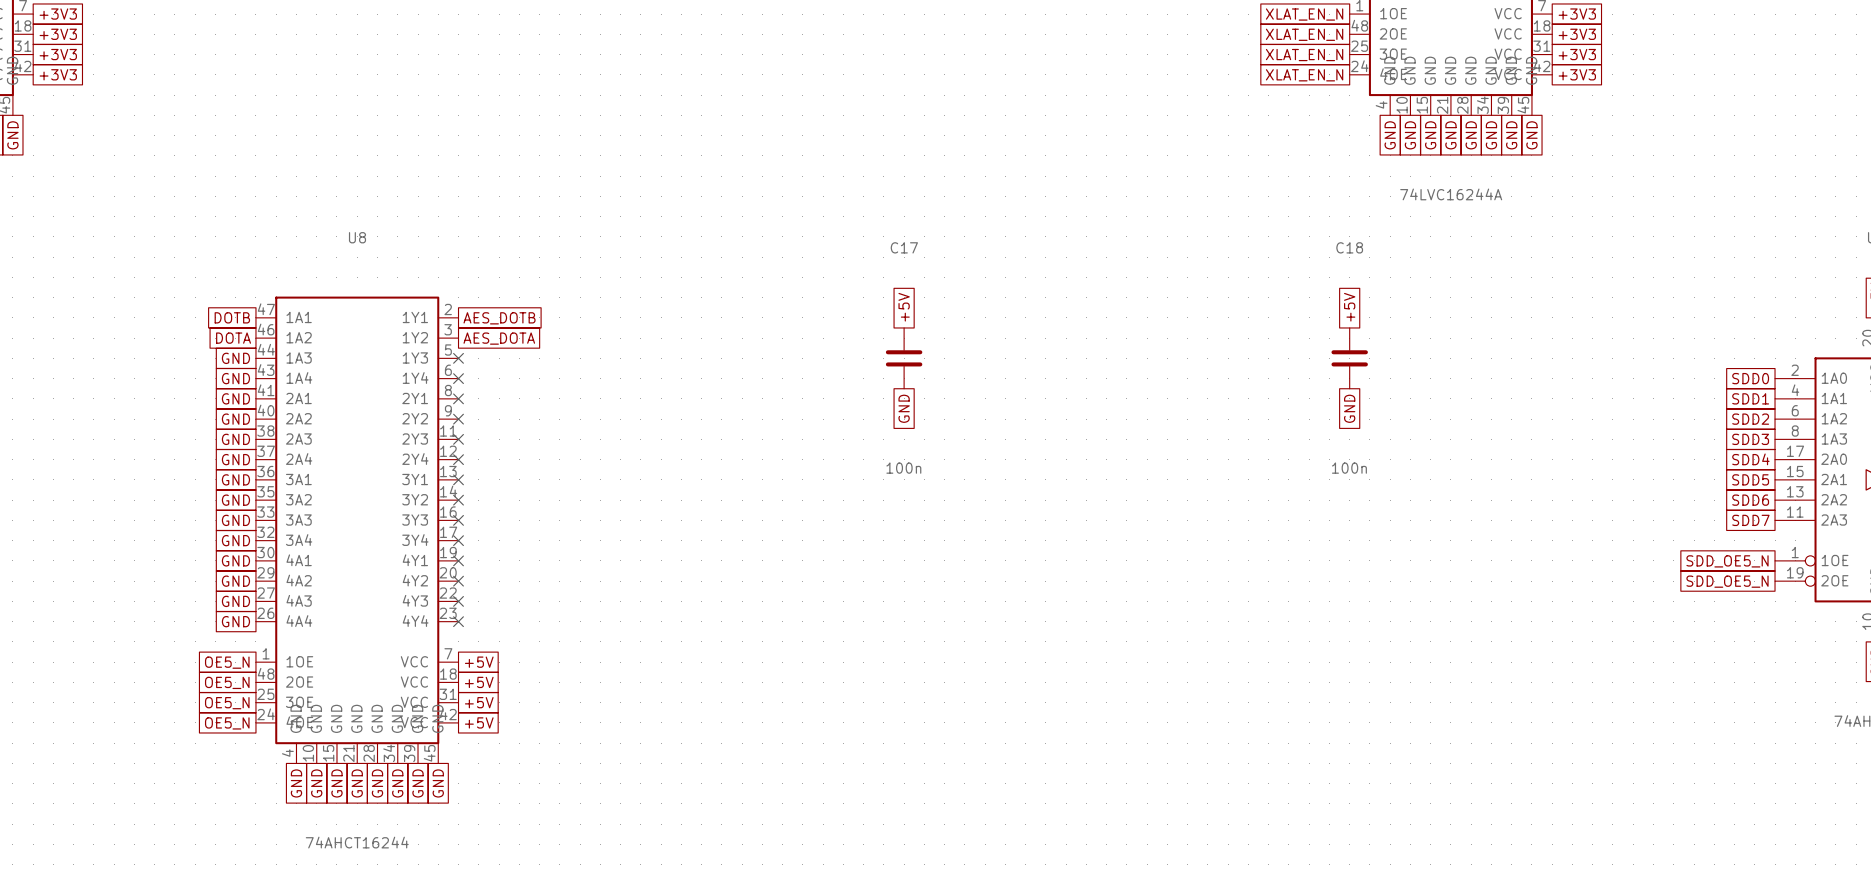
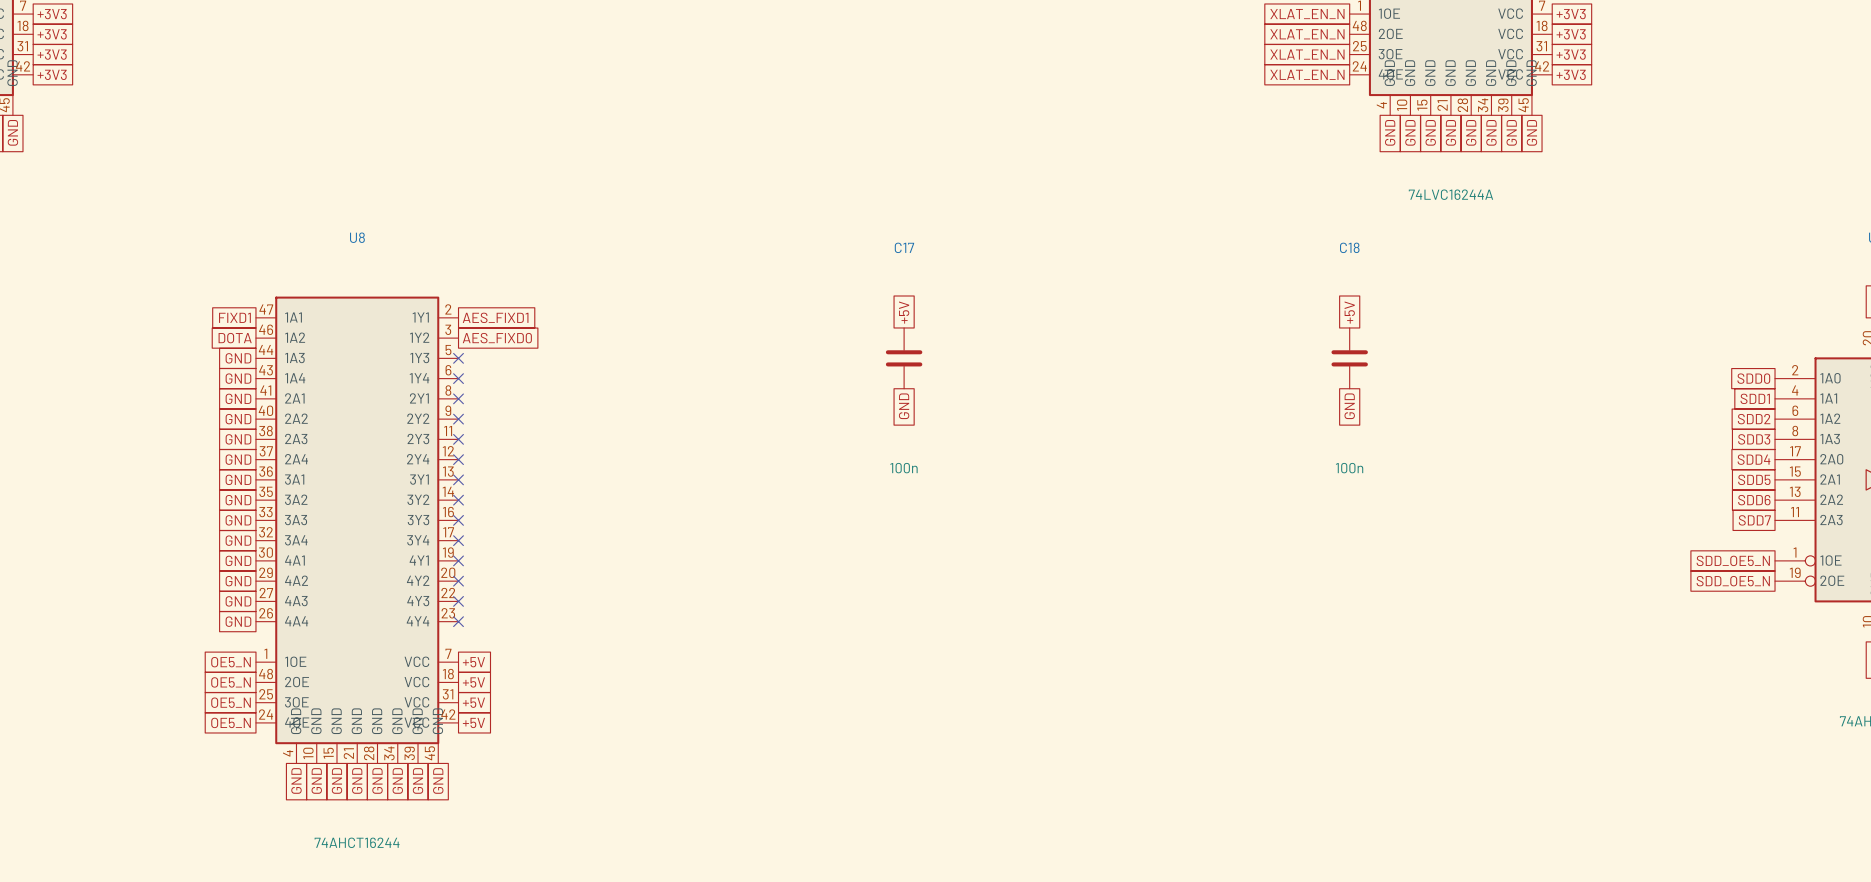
global label: DOTB (232, 317) -> FIXD1 (234, 317)
global label: AES_DOTB (499, 318) -> AES_FIXD1 (495, 317)
global label: AES_DOTA (499, 338) -> AES_FIXD0 (497, 338)

